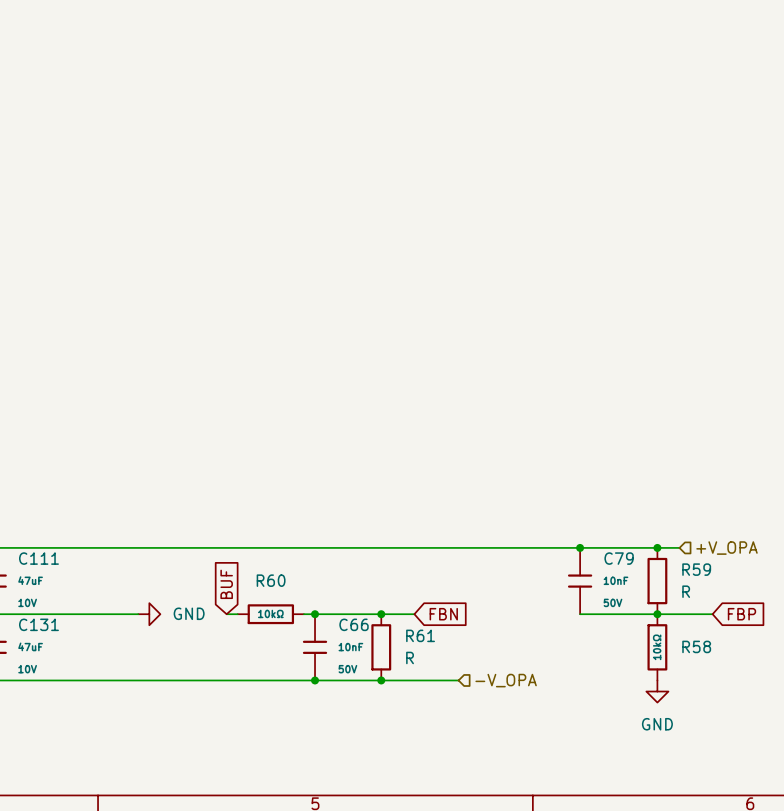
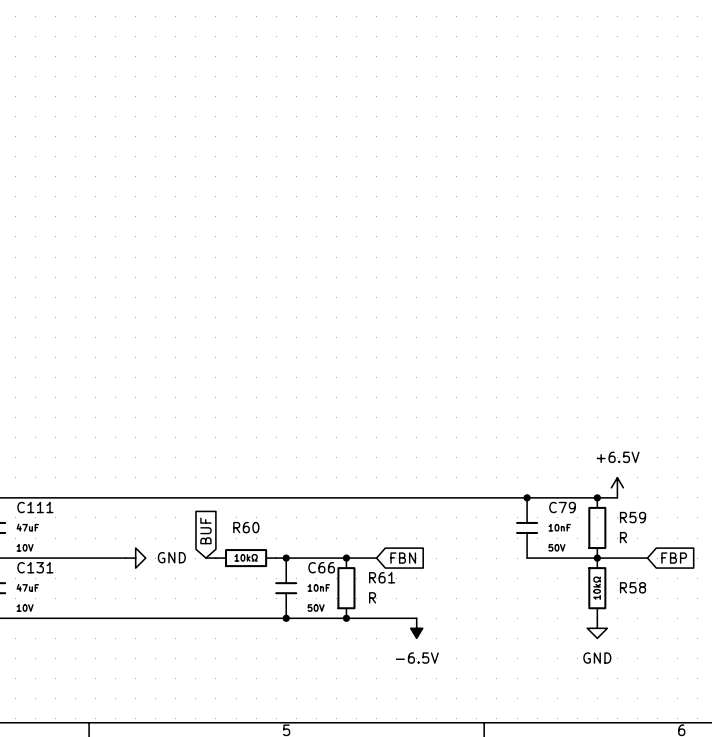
power symbol: none -> +6.5V (617, 487)
hierarchical label: +V_OPA (727, 548) -> none
hierarchical label: -V_OPA (506, 680) -> none
power symbol: none -> -6.5V (416, 628)

